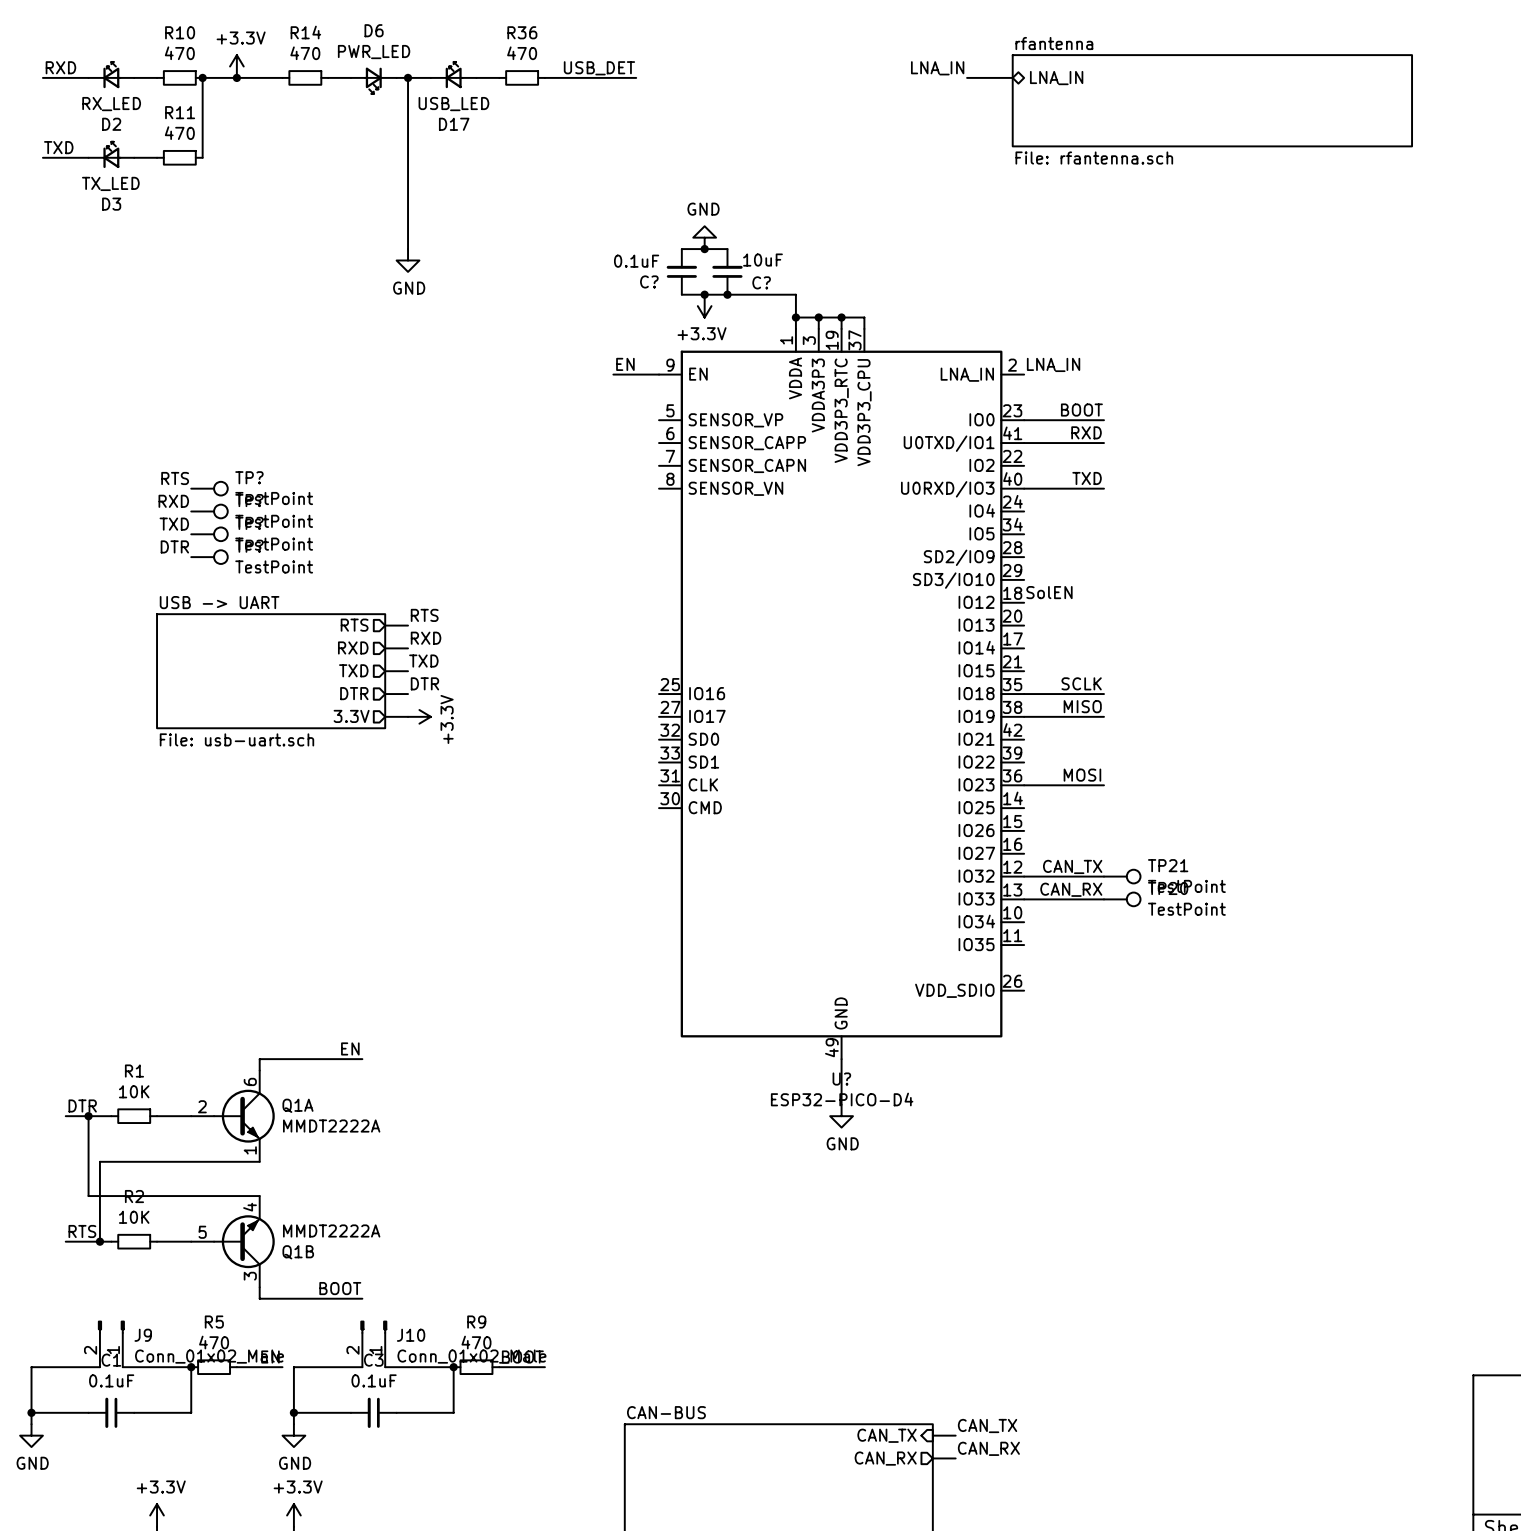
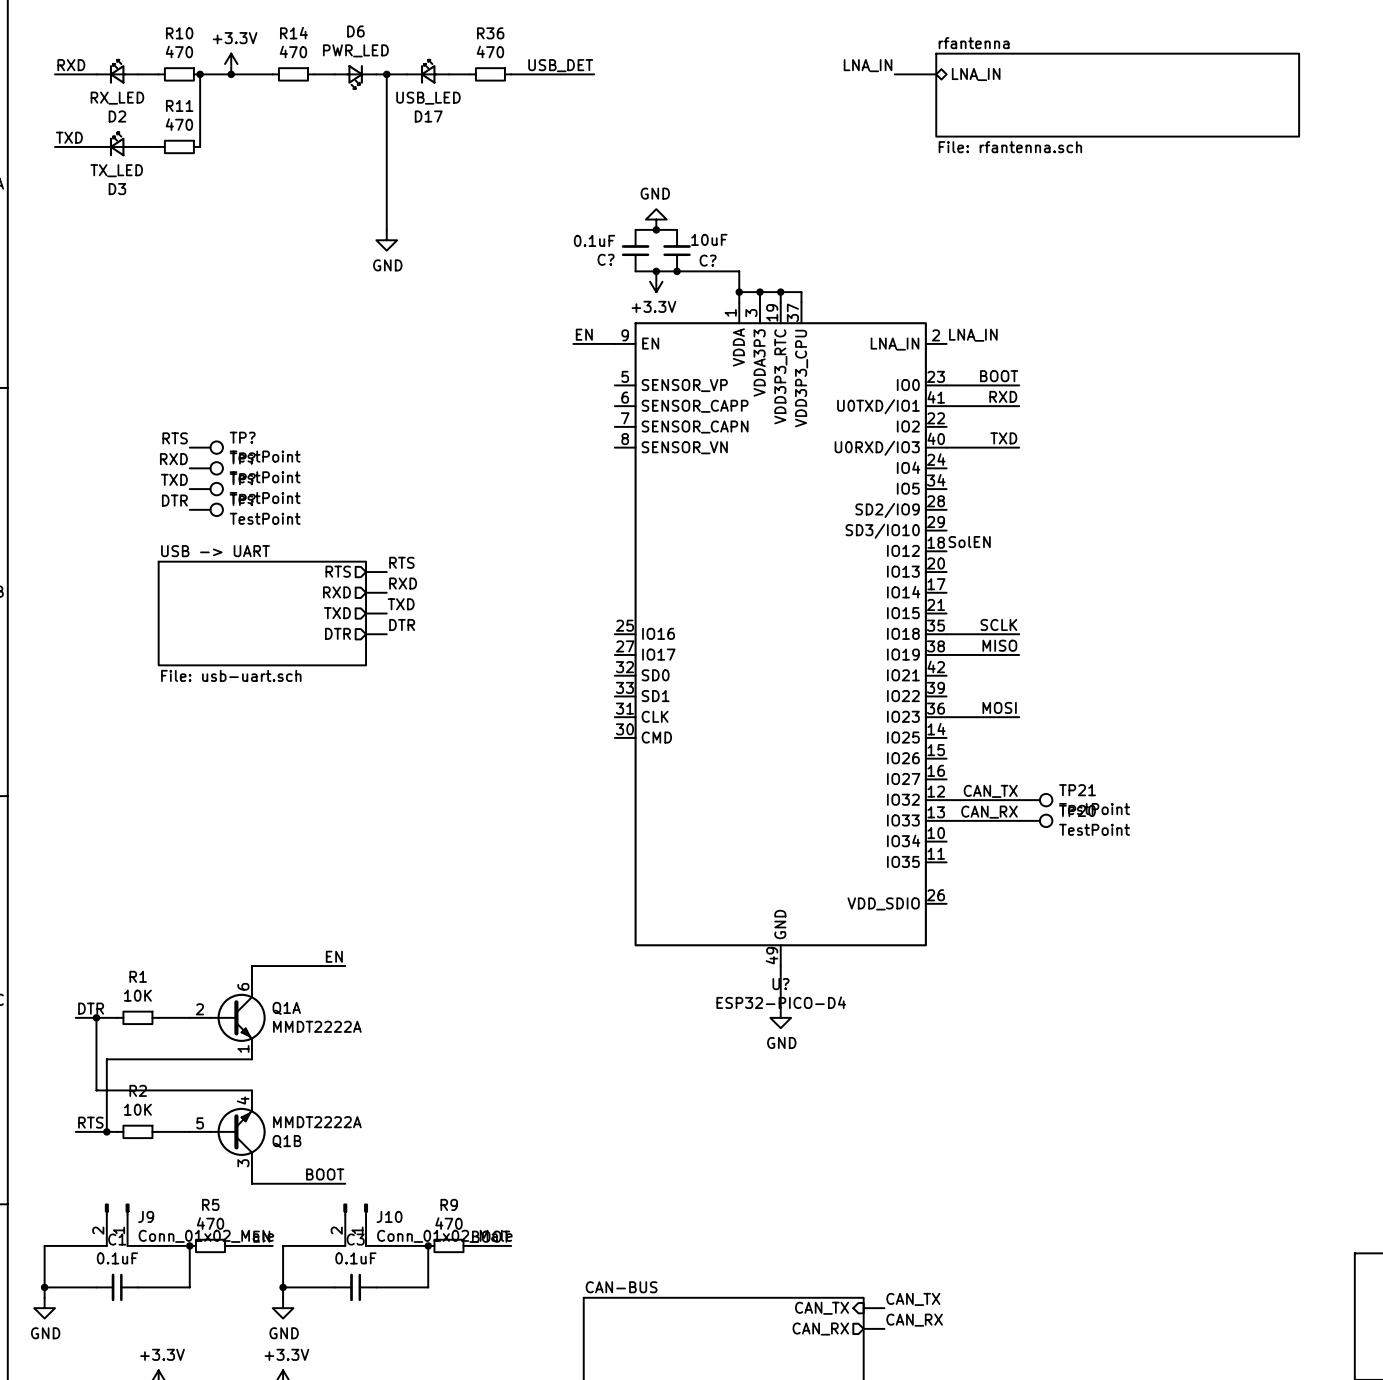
sheet pin: 3.3V (351, 716) -> none
wire: (385, 716) (408, 716) -> none
power symbol: +3.3V (419, 716) -> none

